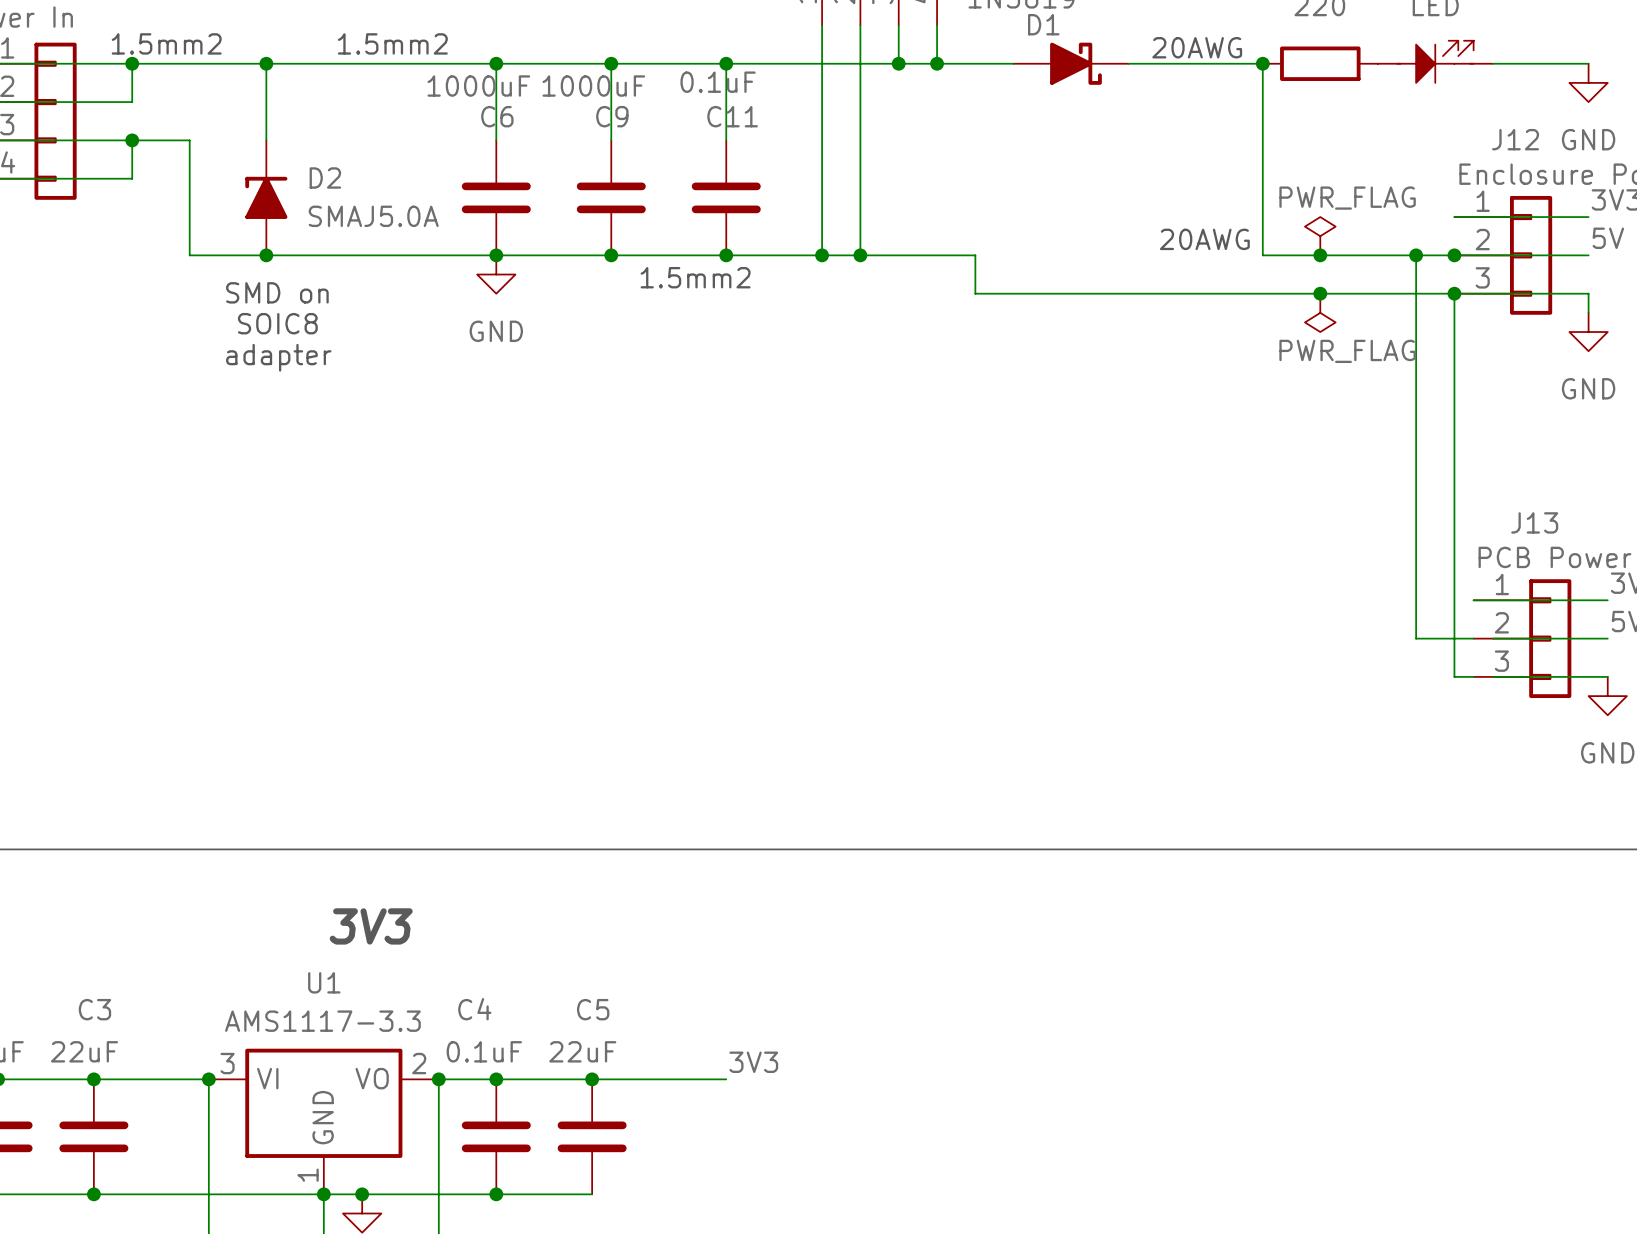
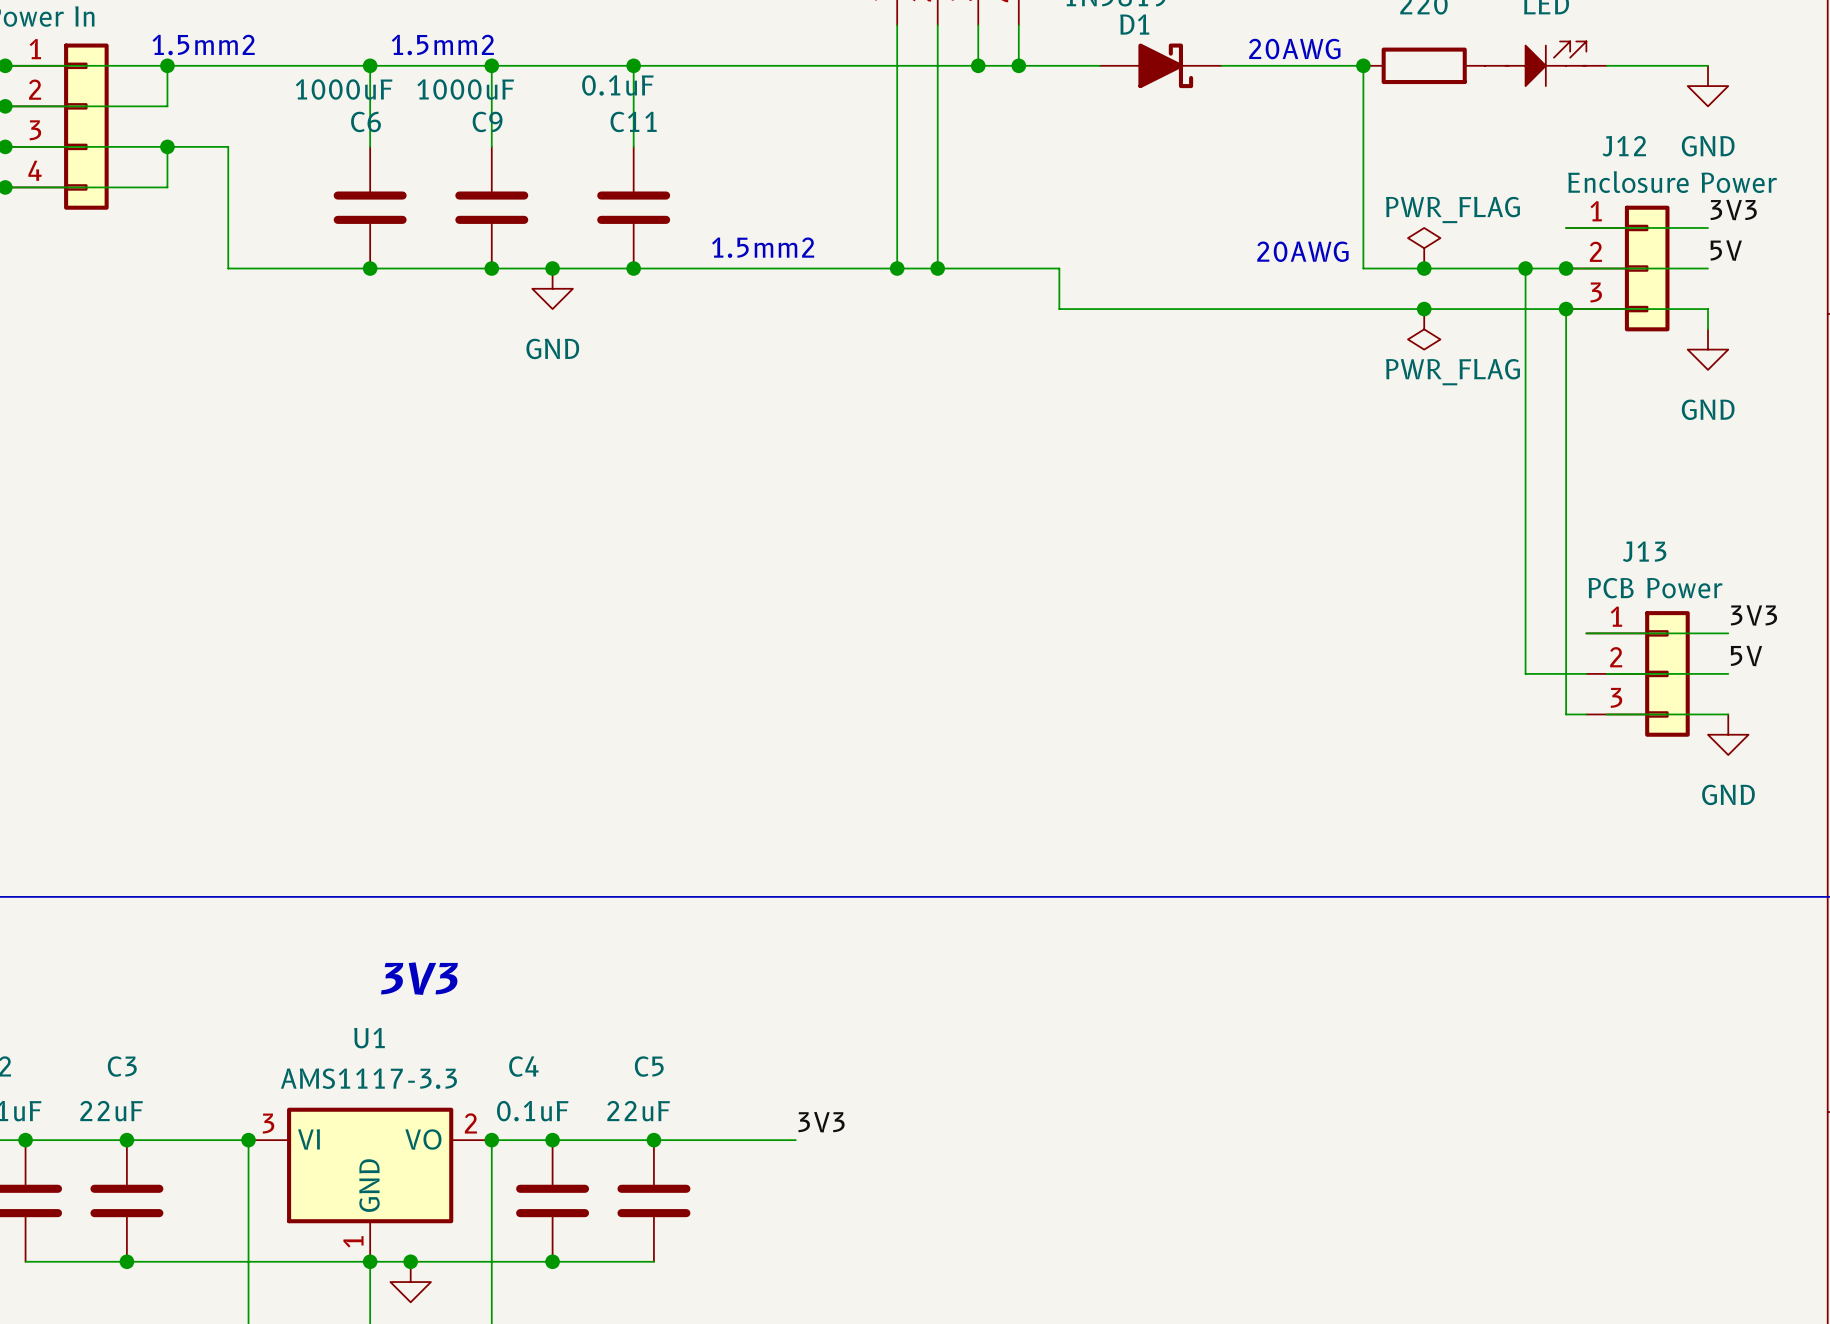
wire: (266, 63) (266, 140) -> none
junction position: (266, 63) -> (370, 65)
junction: none -> (491, 65)
wire: (496, 63) (496, 140) -> (370, 65) (370, 146)
junction: (496, 63) -> none
junction: none -> (633, 65)
wire: (611, 63) (611, 140) -> (491, 65) (491, 146)
junction: (611, 63) -> none
wire: (726, 63) (726, 140) -> (633, 65) (633, 146)
junction: (726, 63) -> none
D2: SMAJ5.0A (266, 197) -> none
C6 position: (496, 197) -> (370, 207)
C9 position: (611, 197) -> (491, 207)
C11 position: (726, 197) -> (633, 207)
junction position: (266, 255) -> (370, 268)
junction: none -> (491, 268)
junction position: (611, 255) -> (633, 268)
junction: (726, 255) -> none
text position: 1.5mm2 (695, 277) -> 1.5mm2 (763, 247)
text: SMD on (277, 292) -> none
text: SOIC8 (277, 323) -> none
text: adapter (278, 357) -> none

